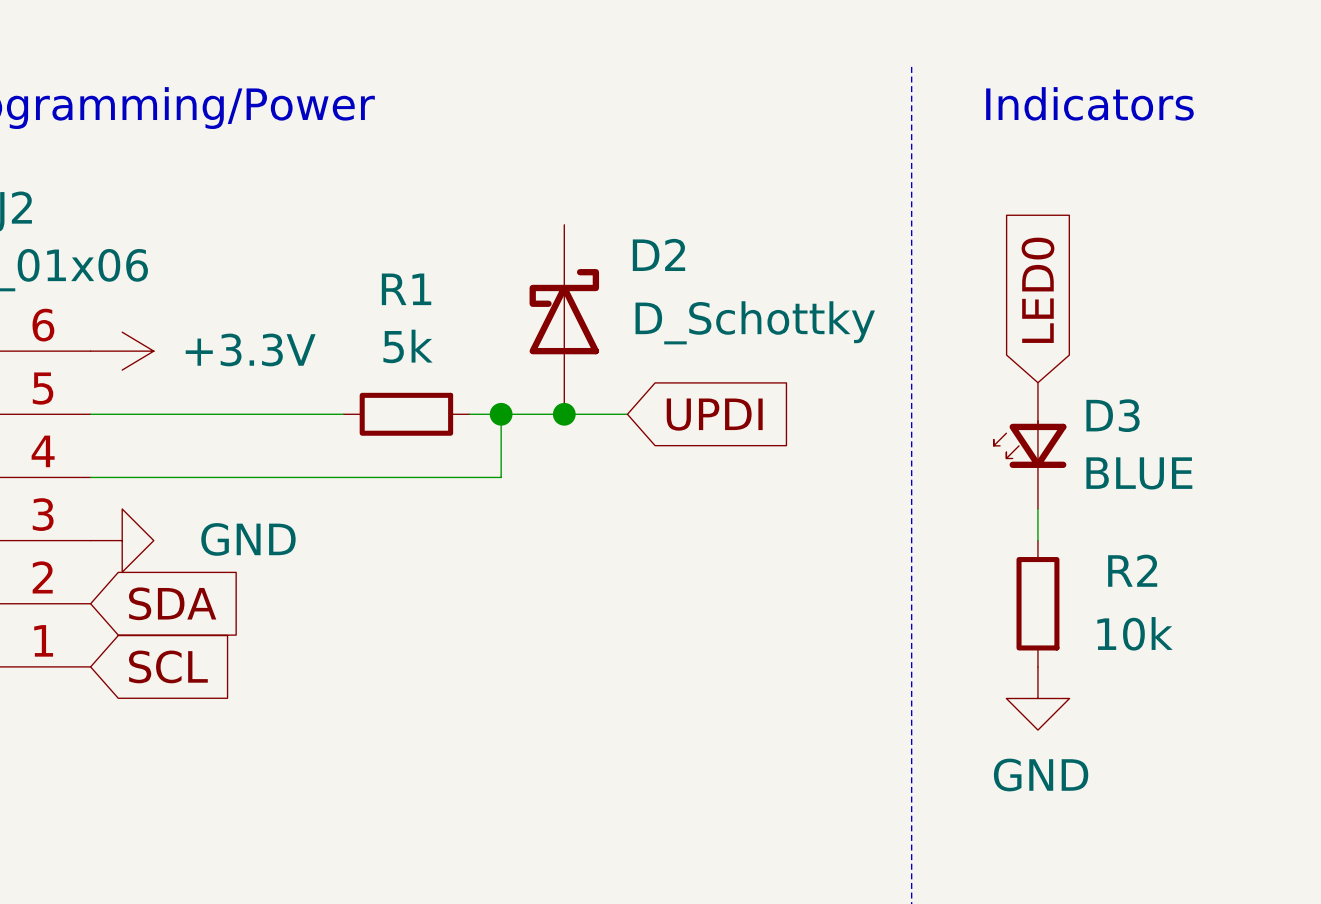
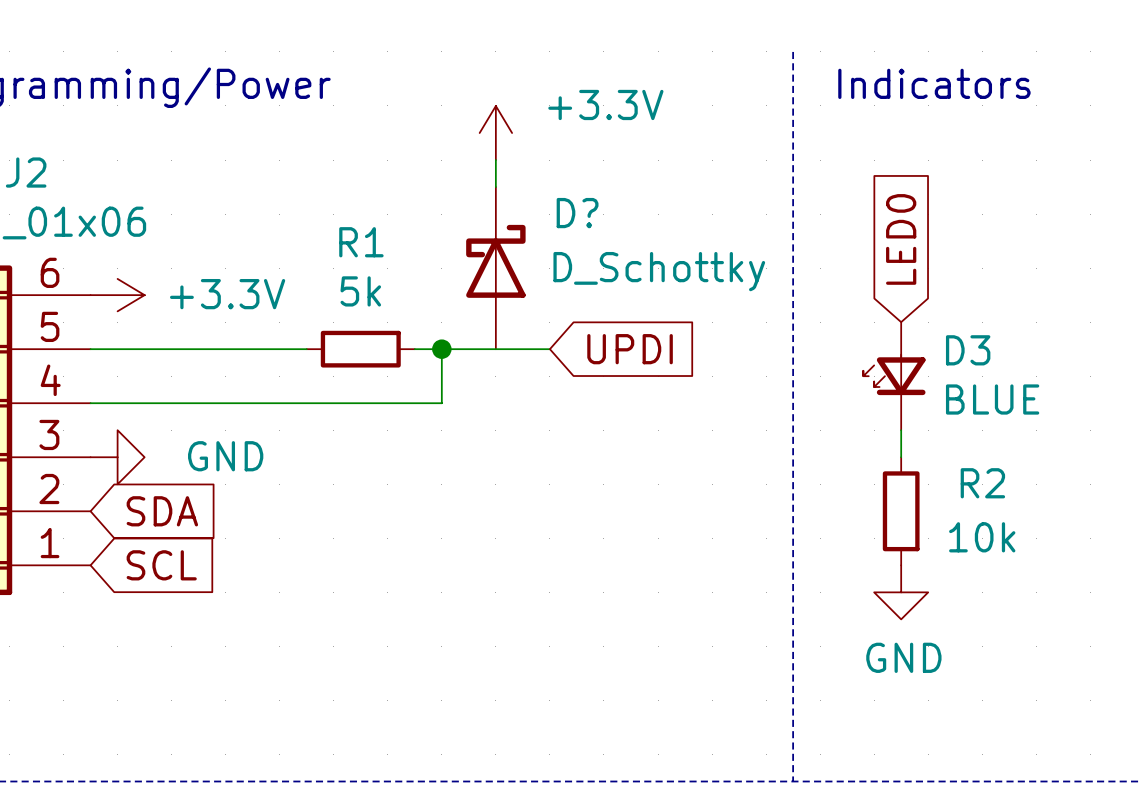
power symbol: none -> +3.3V (495, 133)
wire: none -> (495, 160) (495, 187)
D2 name: D2 (658, 254) -> D? (577, 213)
junction: (564, 414) -> none

